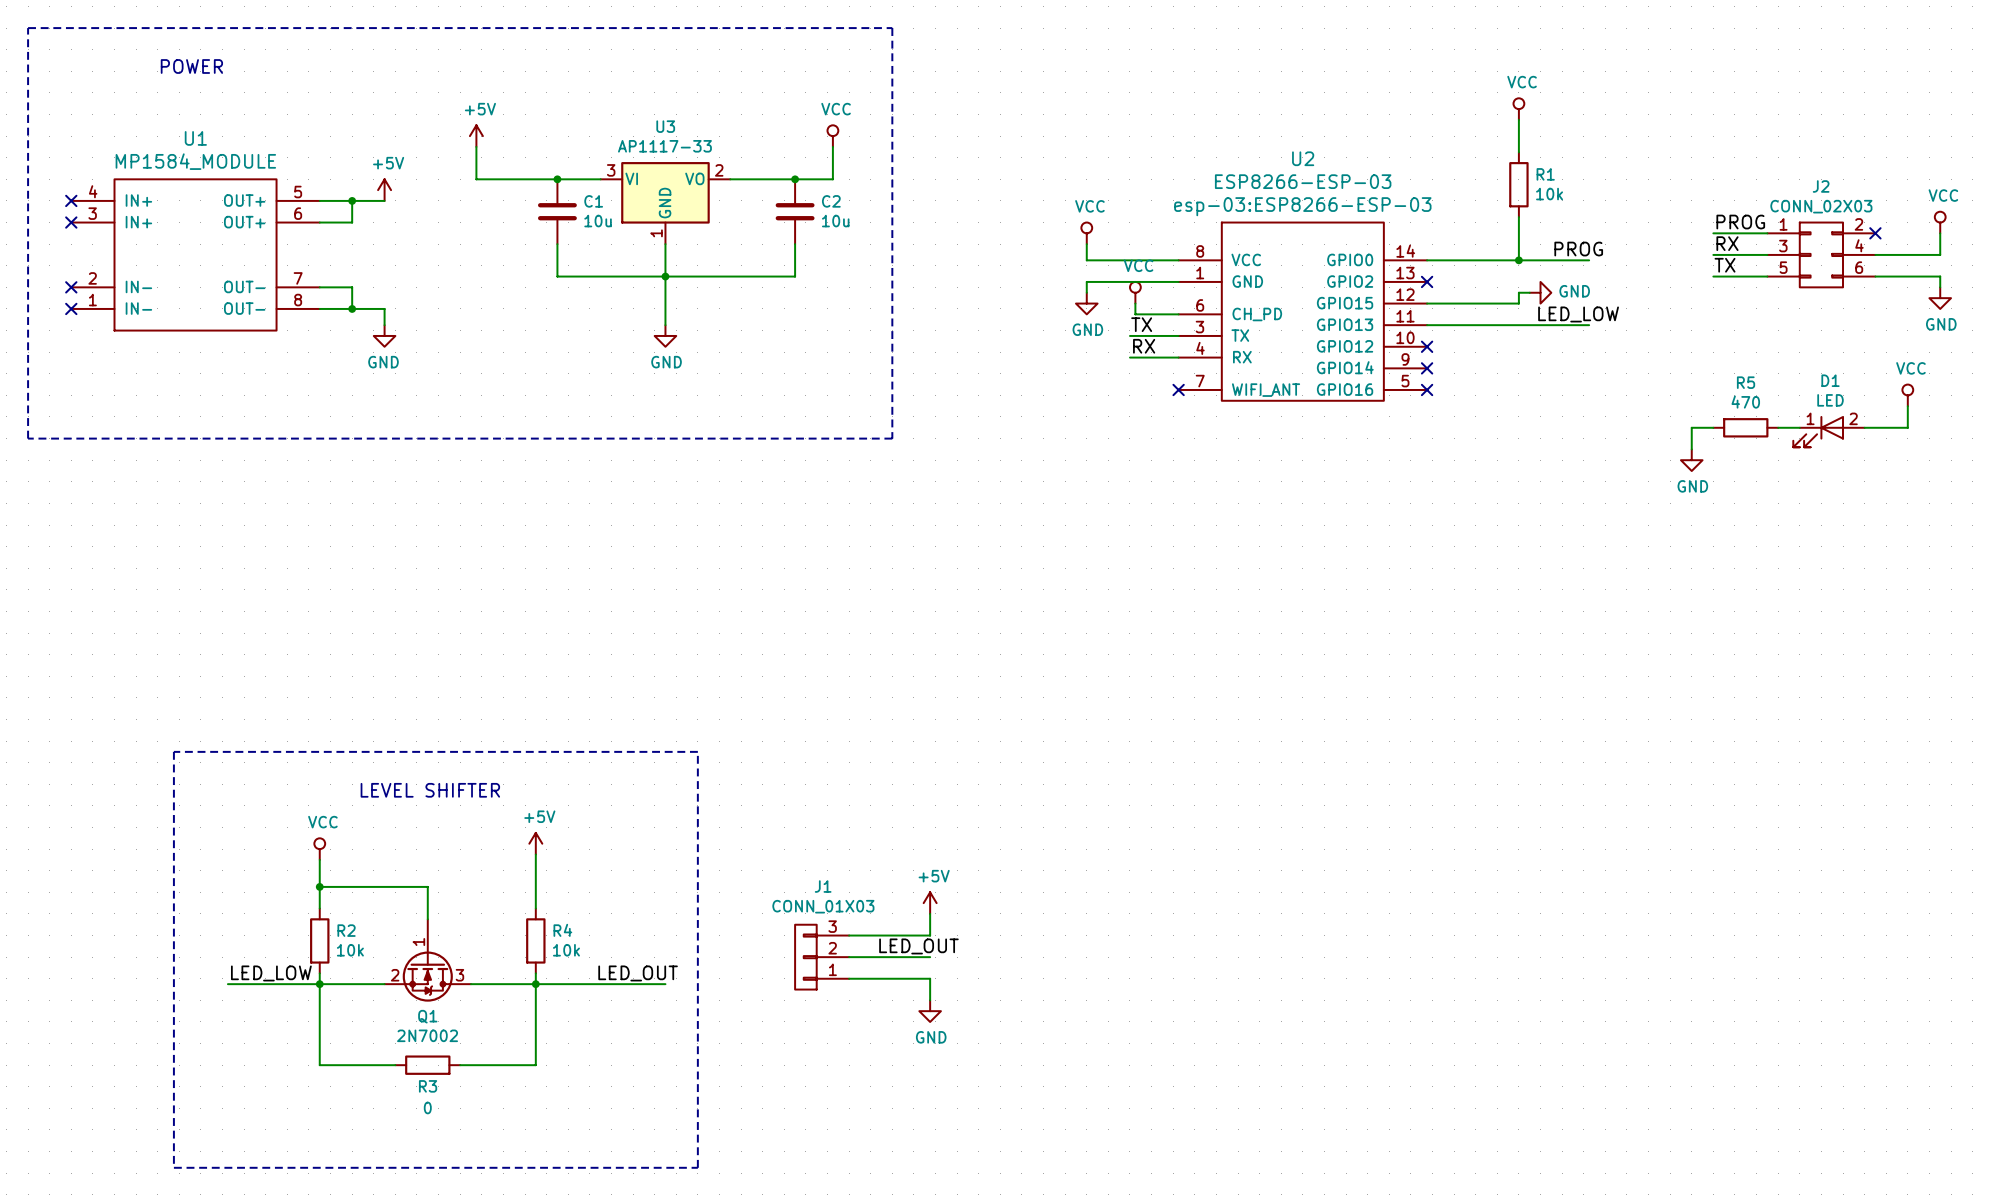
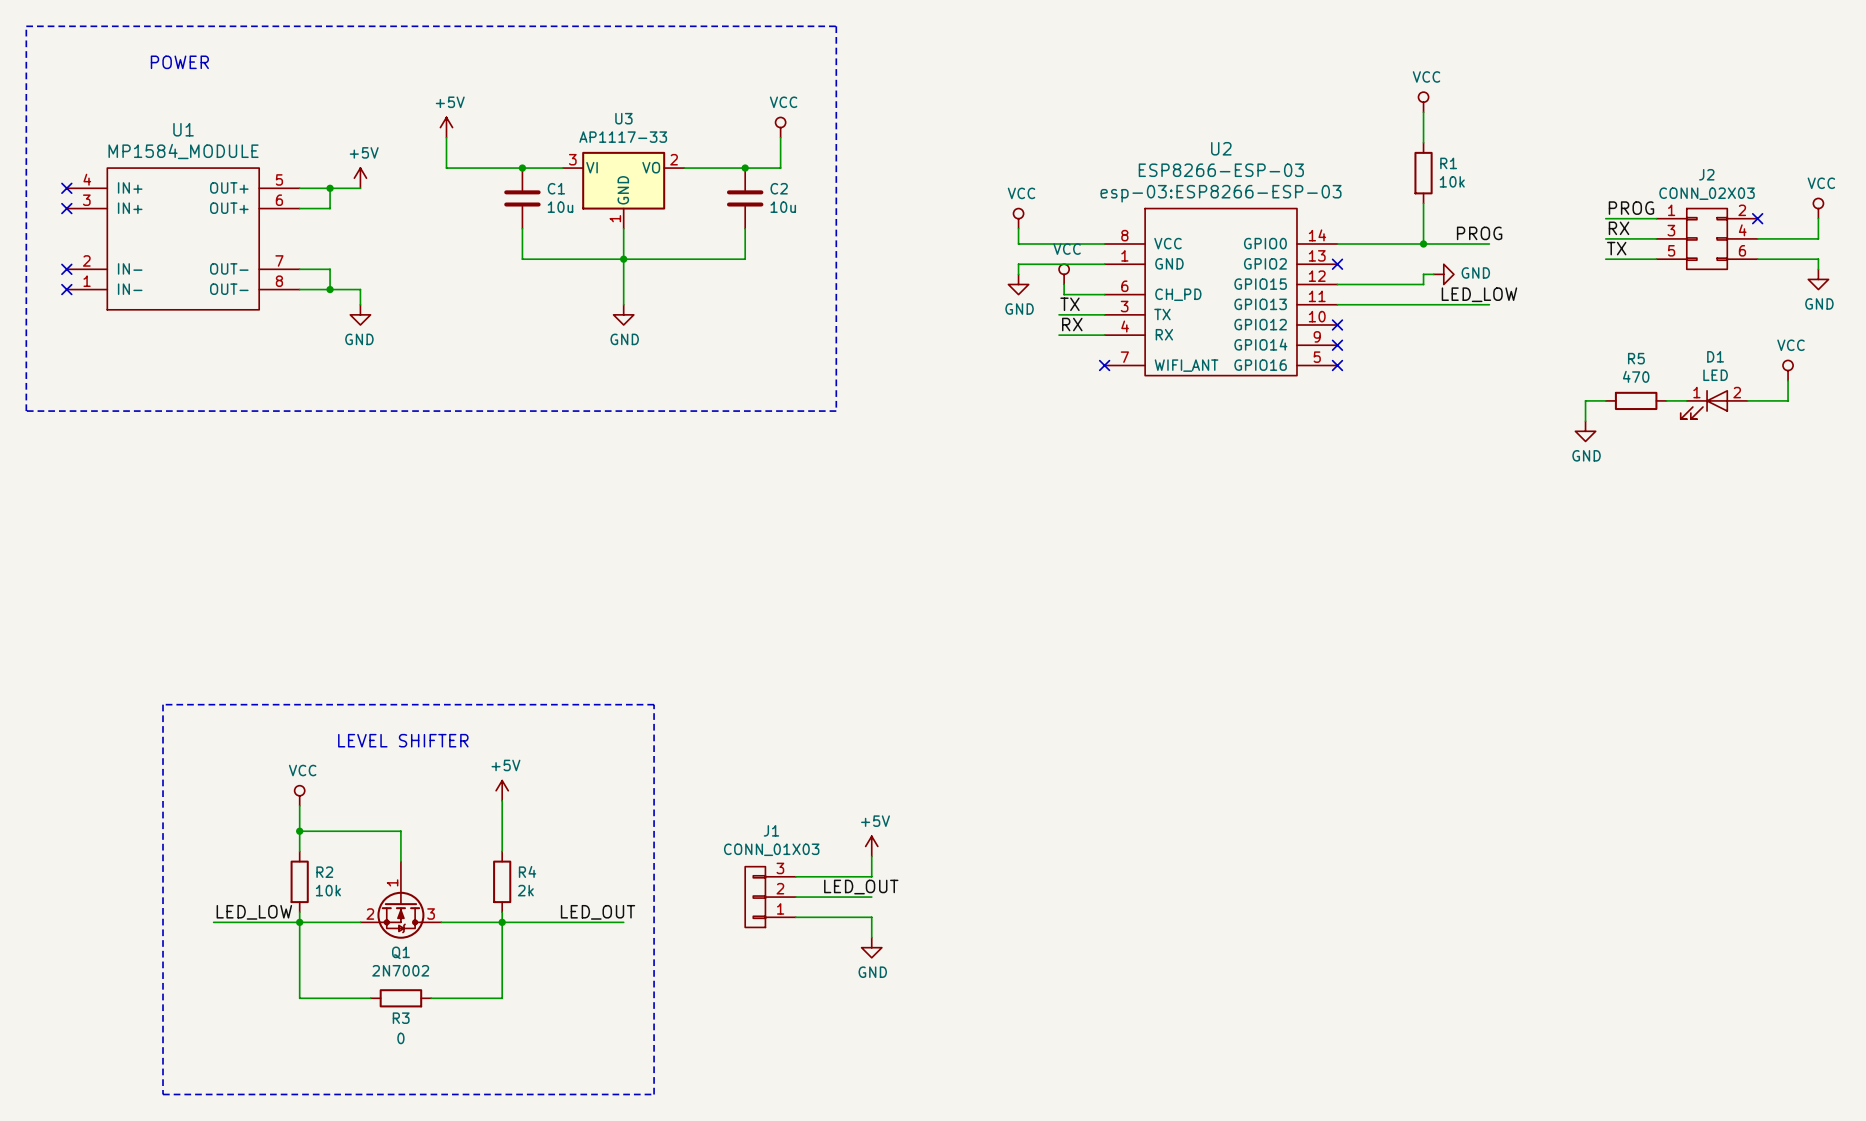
R4 value: 10k (566, 950) -> 2k (525, 890)

